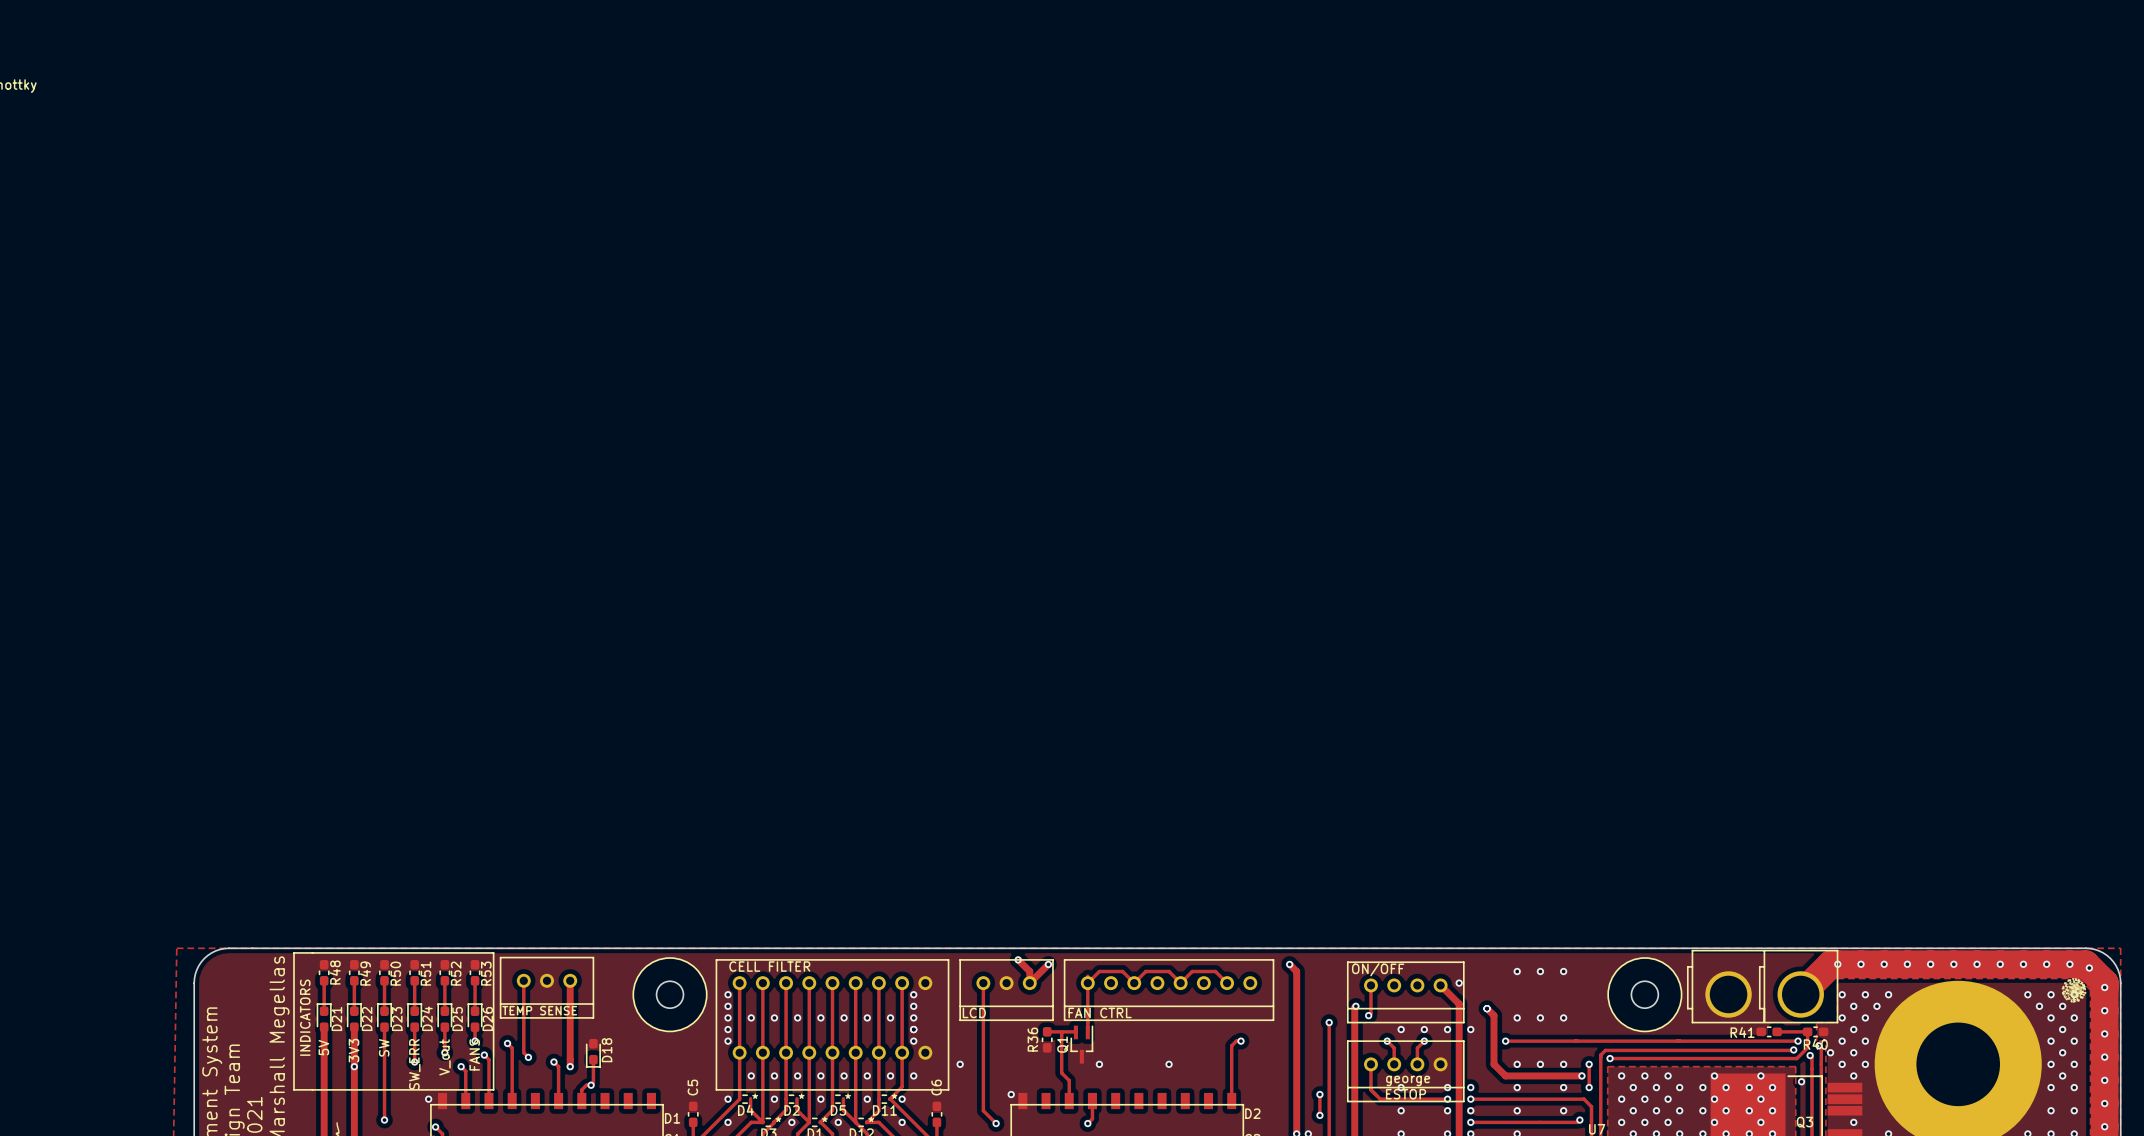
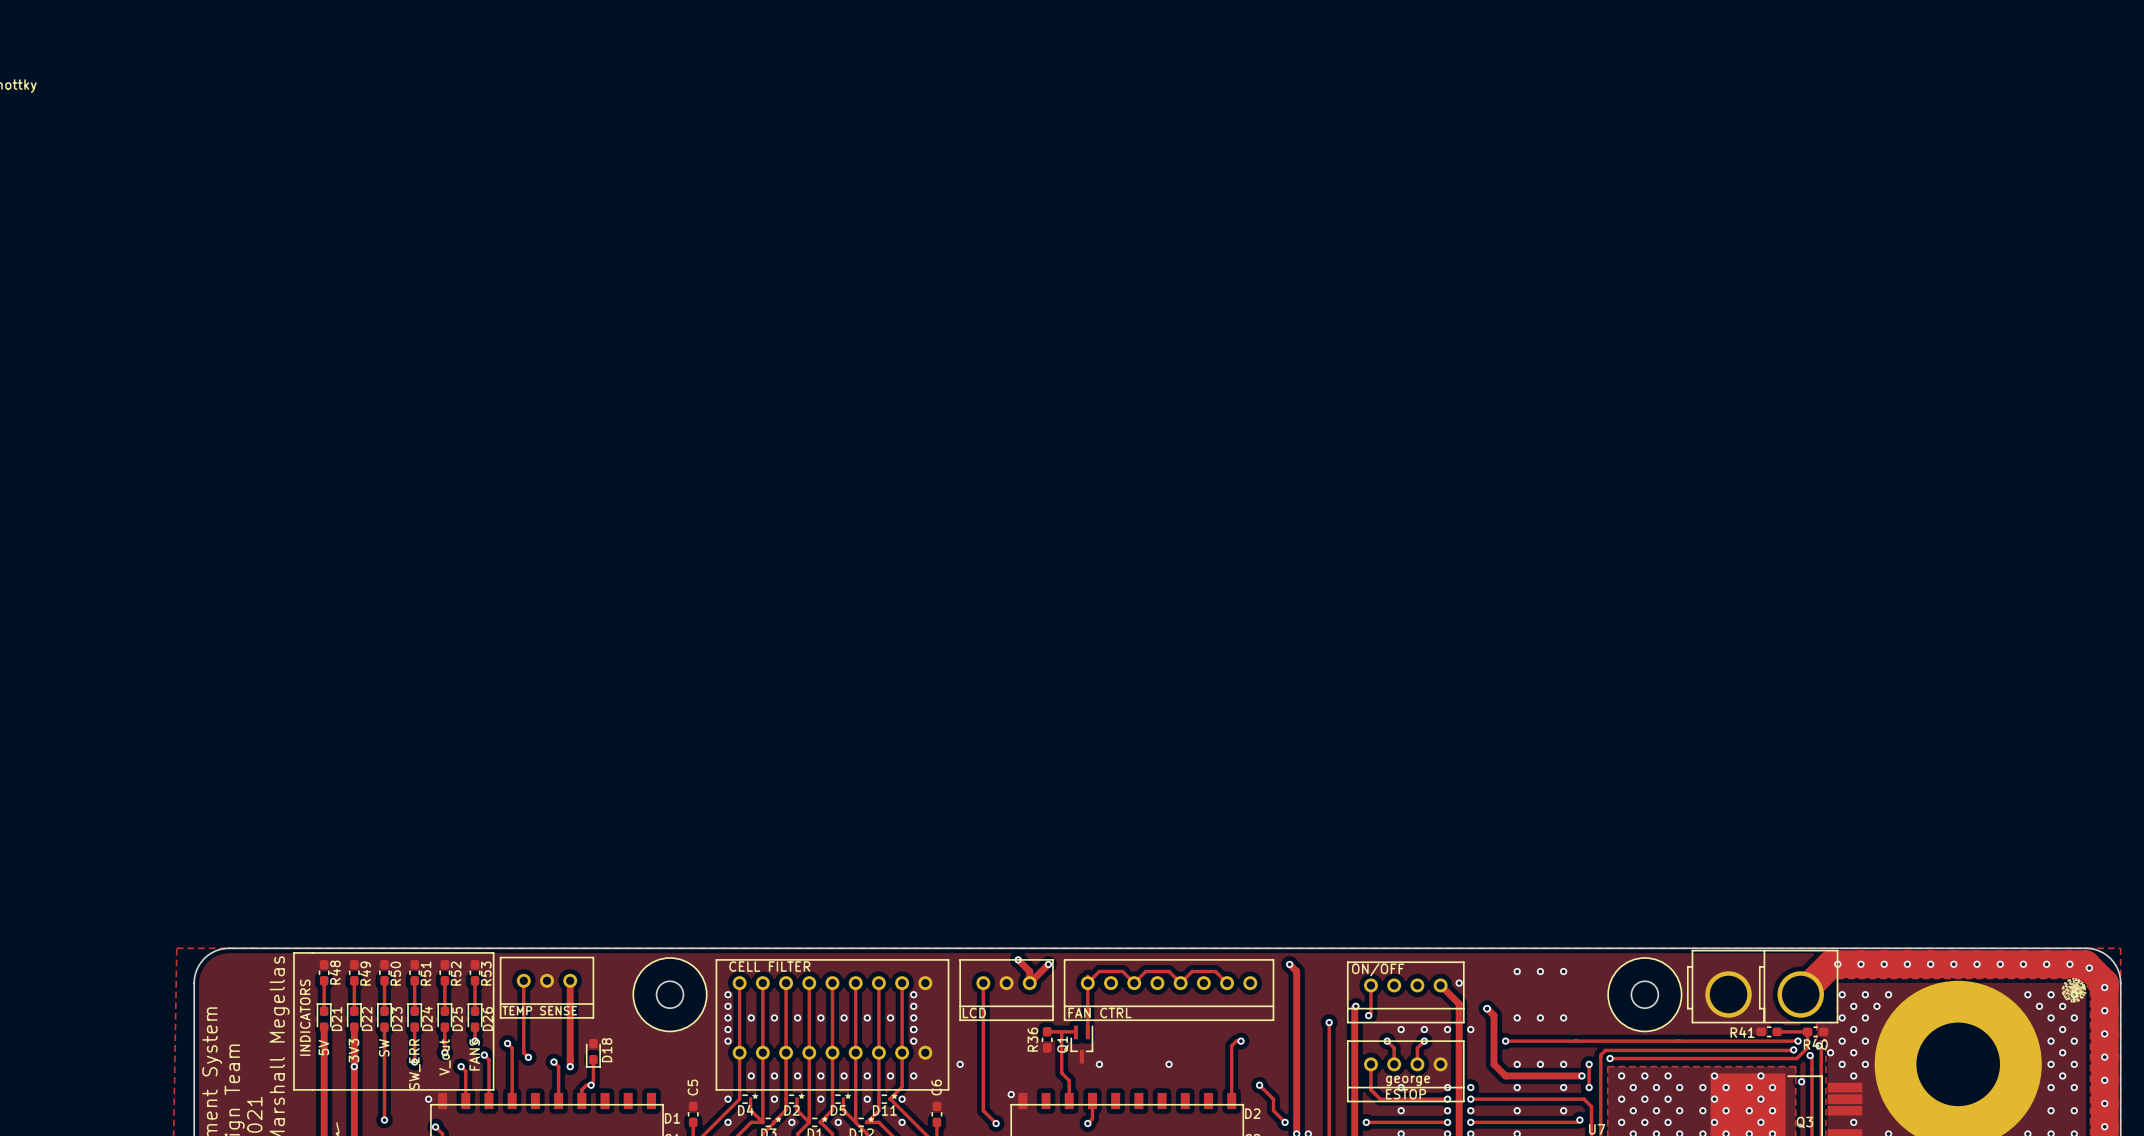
track: none -> (1259, 1085) (1273, 1099) (1273, 1110) (1285, 1122)
via: none -> (1259, 1085)
track: (1319, 1094) (1319, 1115) -> none
via: (1319, 1094) -> none
via: (1319, 1115) -> none
via: none -> (1285, 1122)
track: none -> (1366, 1122) (1447, 1122)
via: none -> (1366, 1122)
via: none -> (1447, 1122)

